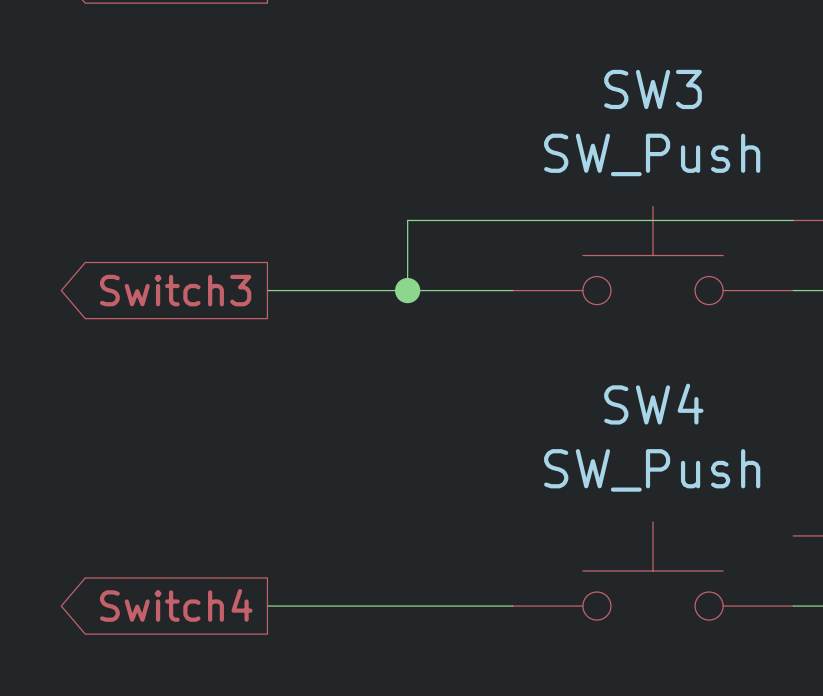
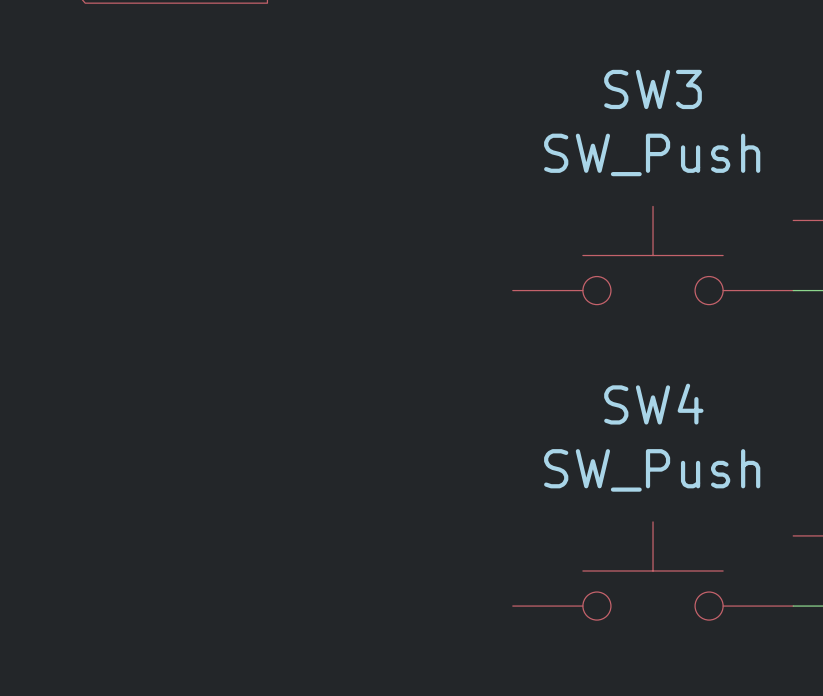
wire: (793, 220) (407, 220) (407, 290) -> none
global label: Switch3 (175, 290) -> none
wire: (267, 290) (512, 290) -> none
junction: (407, 290) -> none
global label: Switch4 (176, 605) -> none
wire: (267, 606) (512, 606) -> none

